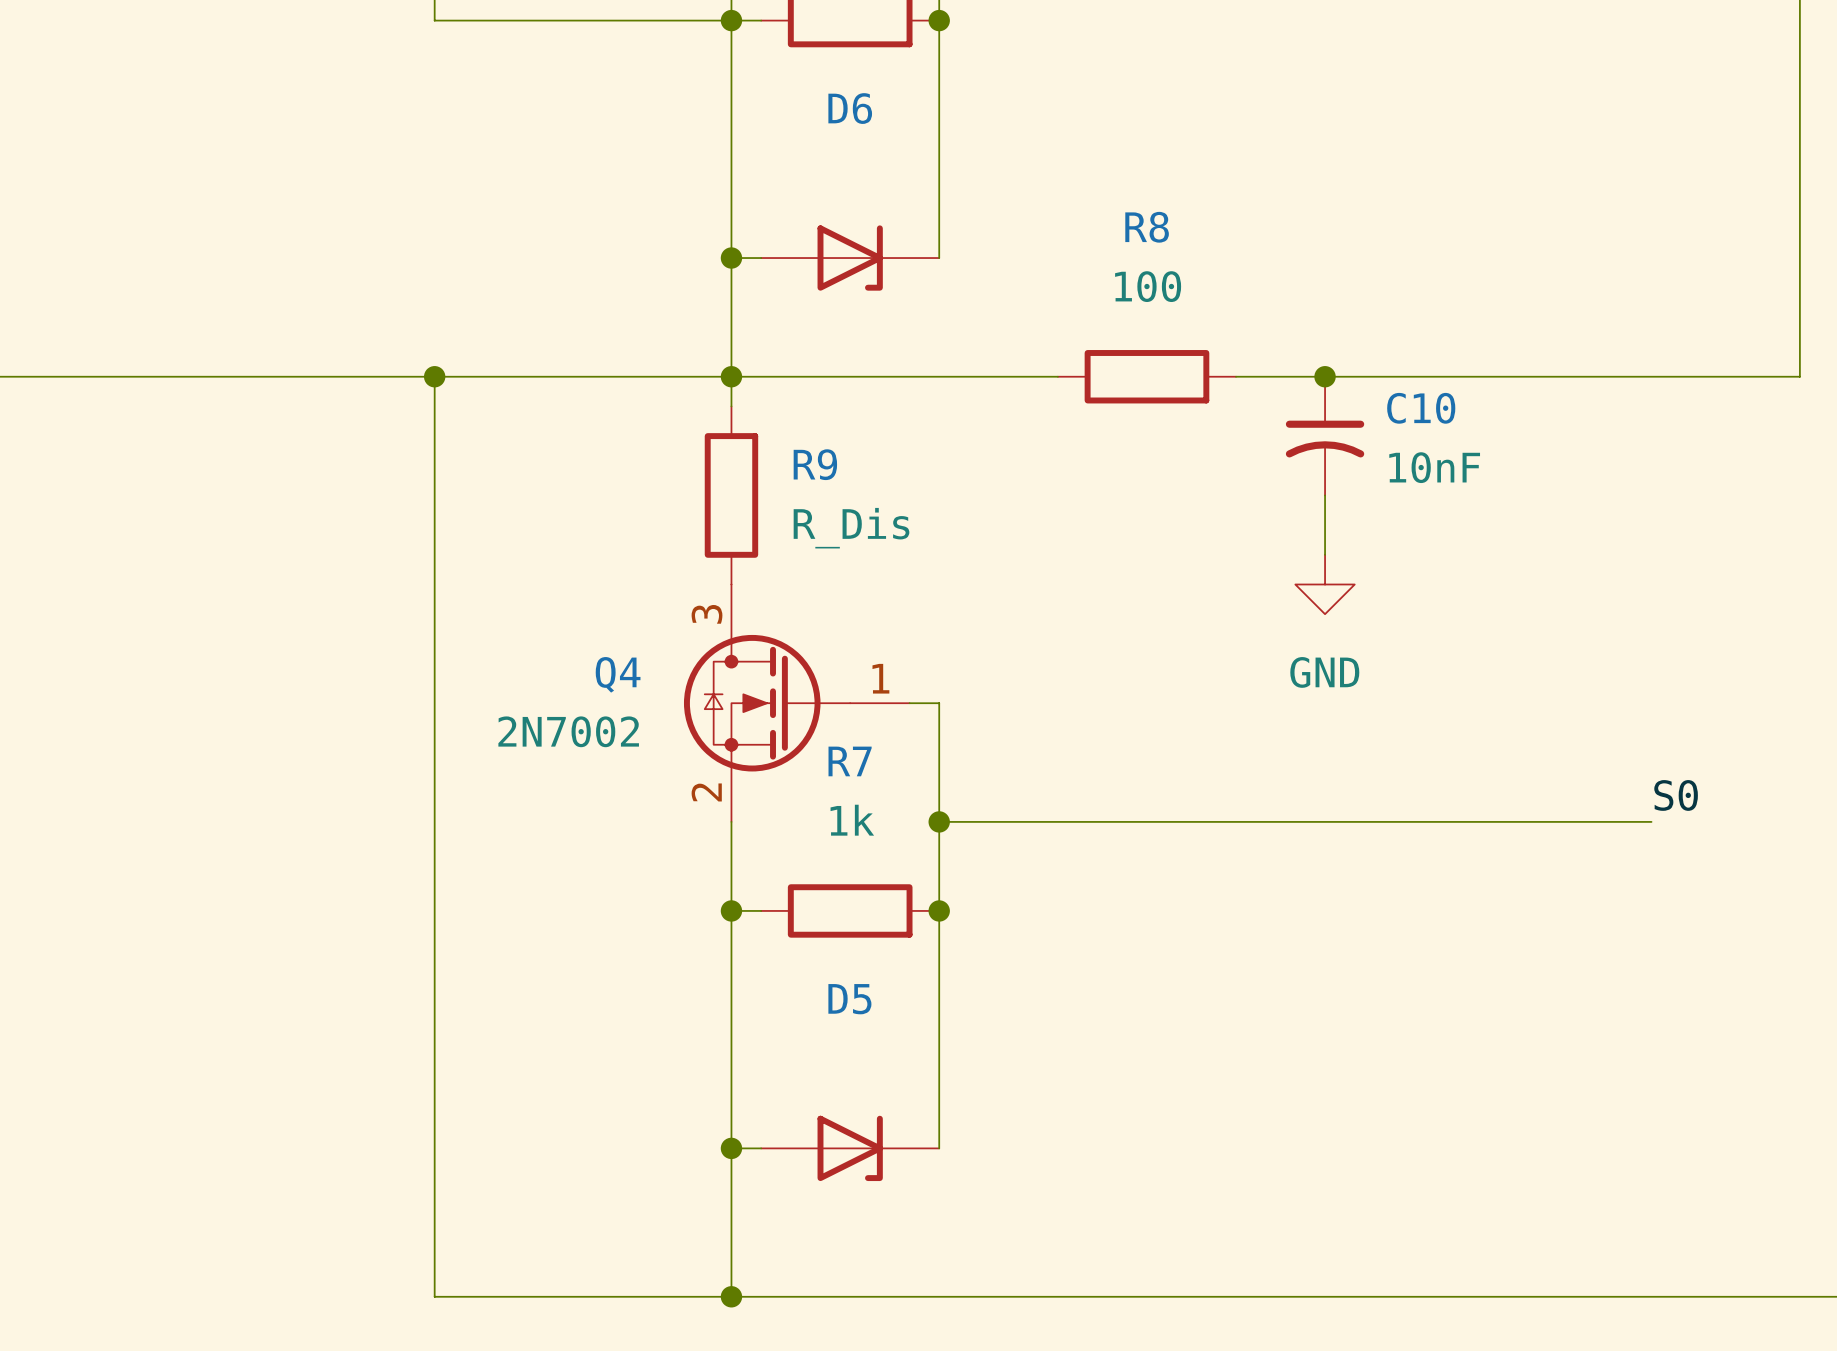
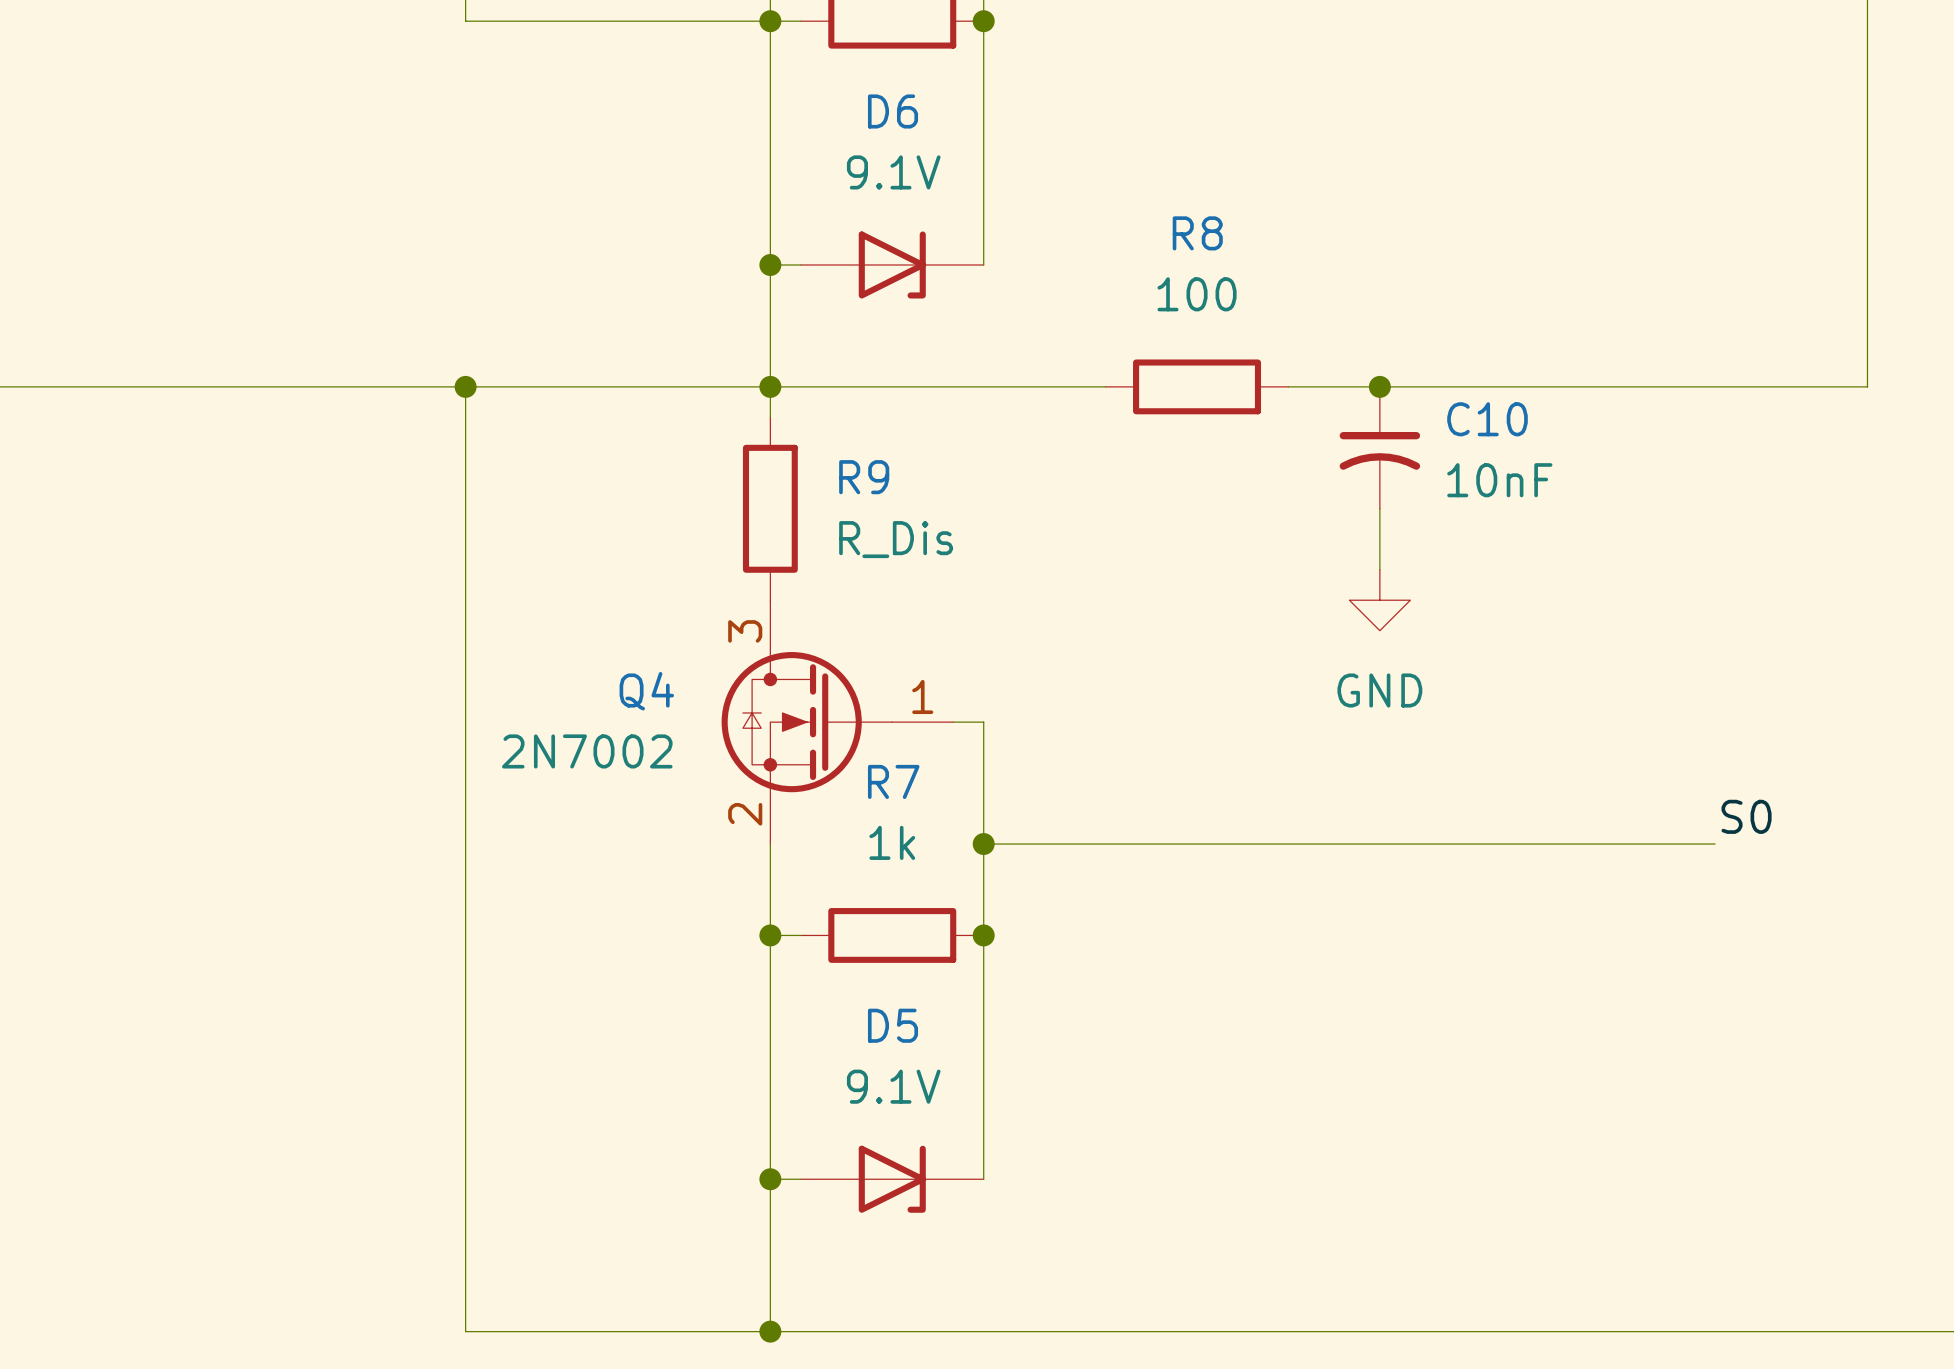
D6 value: none -> 9.1V (893, 172)
D5 value: none -> 9.1V (893, 1086)

